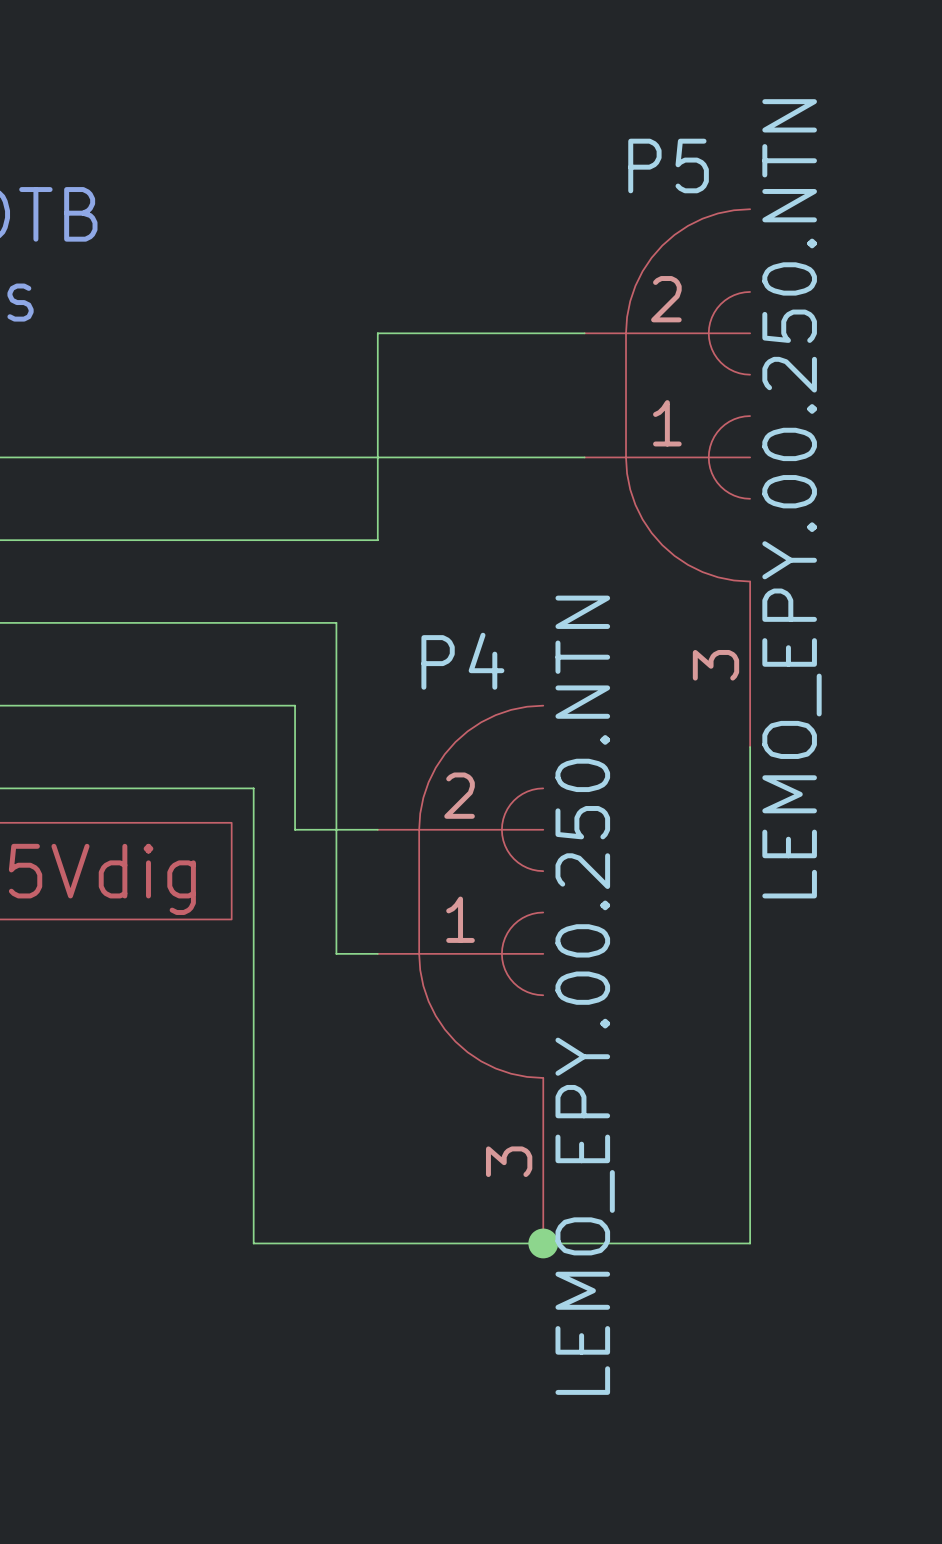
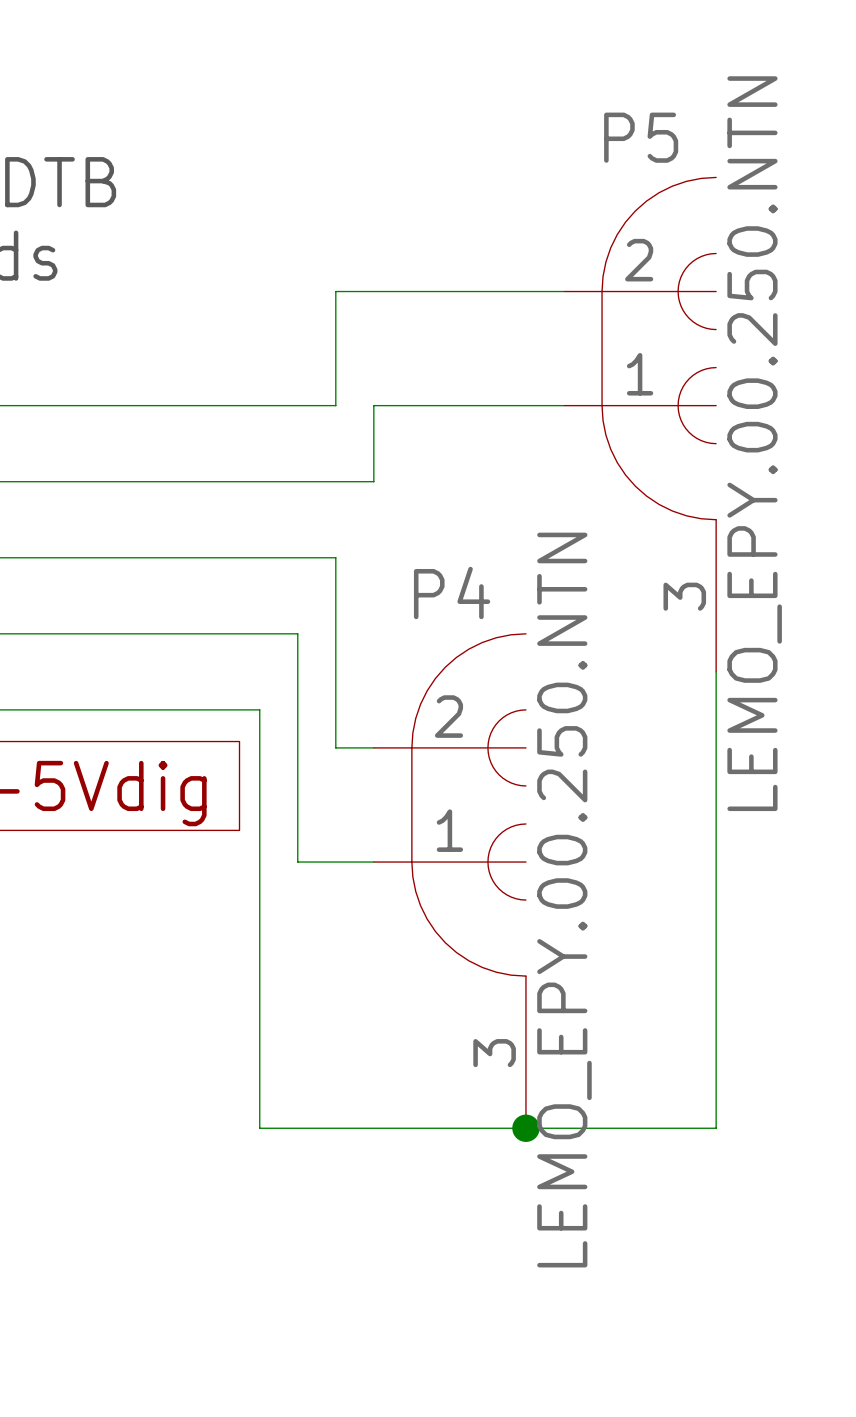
wire: (377, 333) (377, 457) (336, 457) -> (373, 291) (335, 291) (335, 405)
wire: (295, 829) (336, 829) (336, 953) -> (297, 747) (297, 862) (335, 862)

